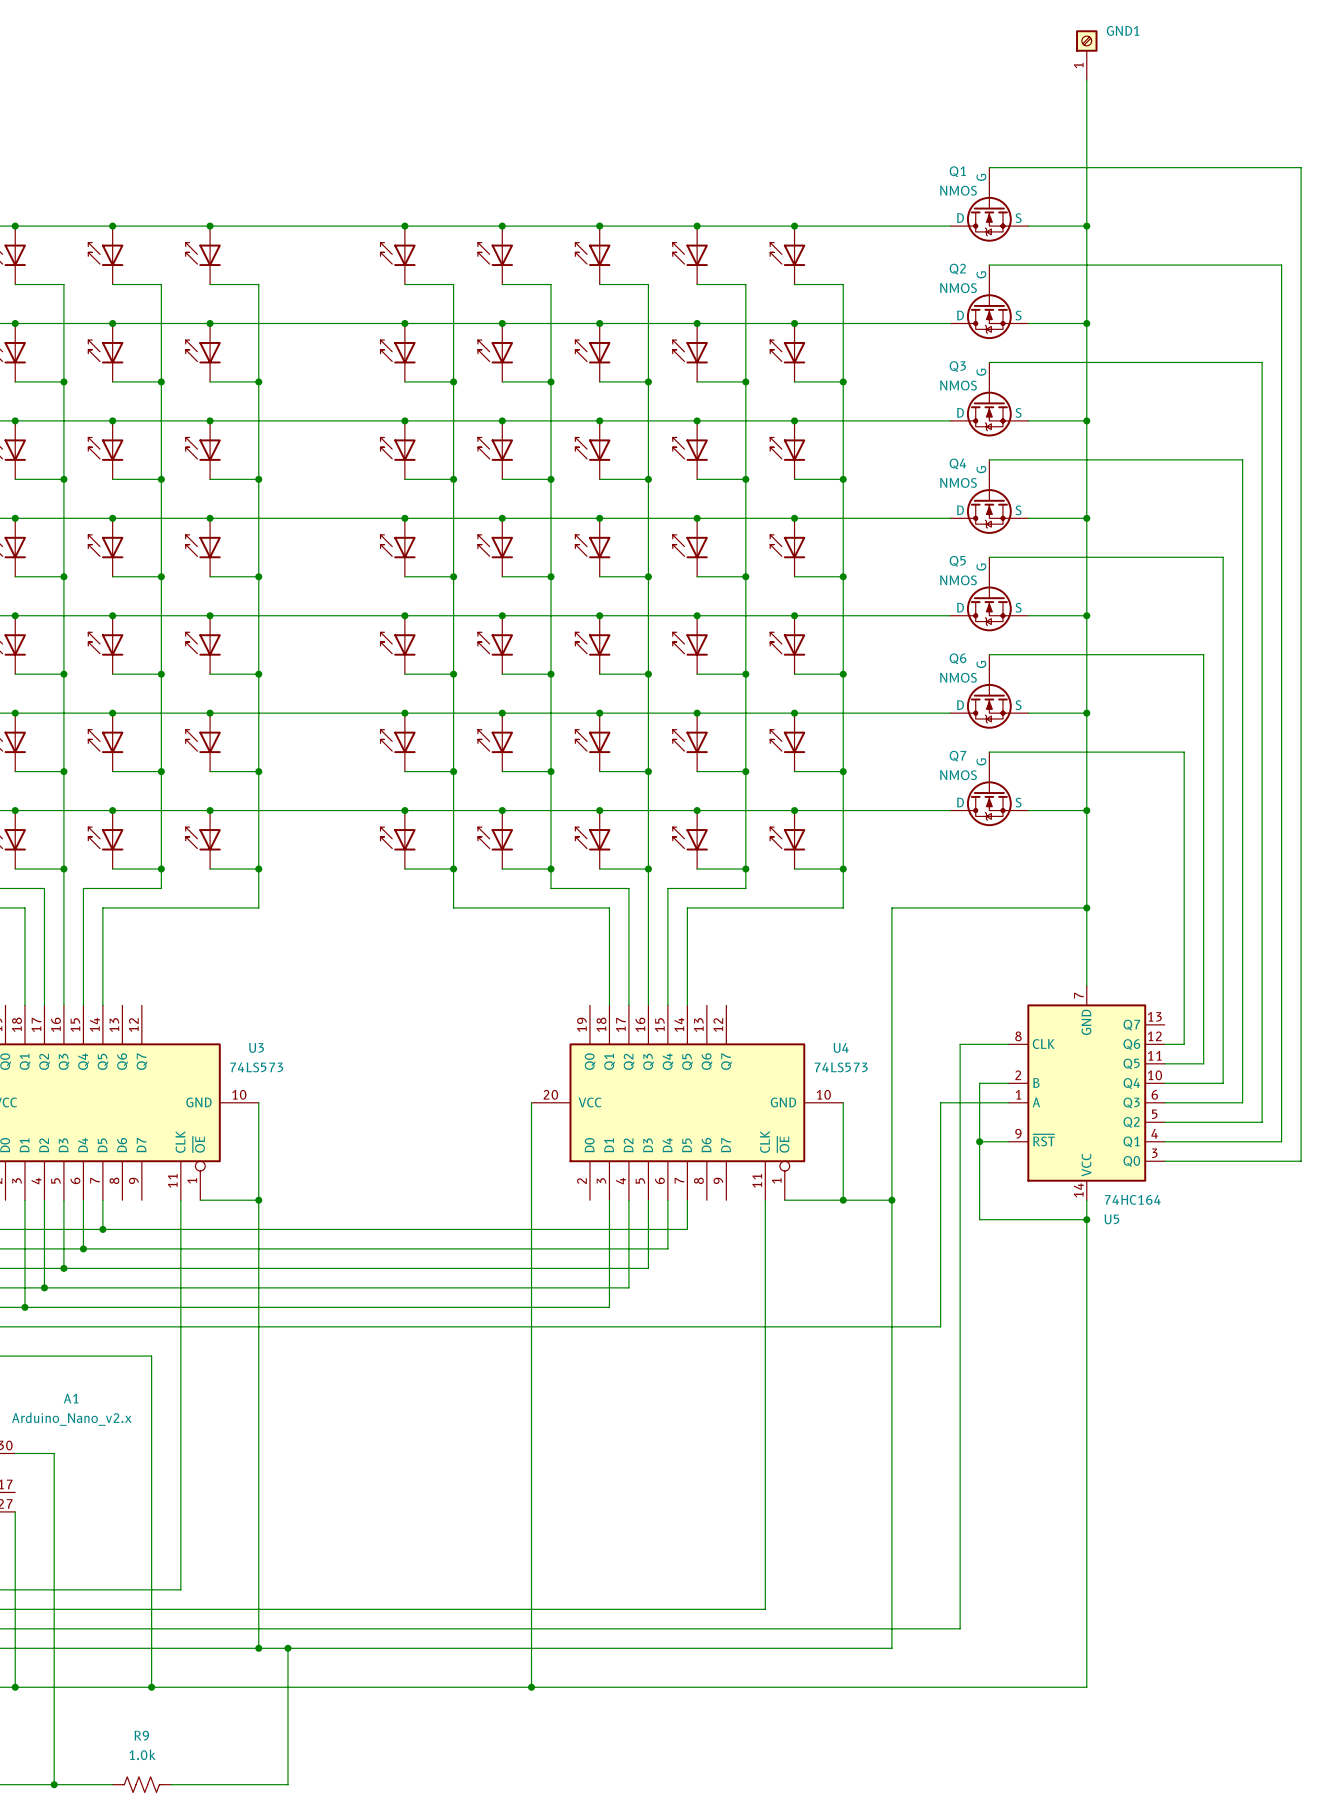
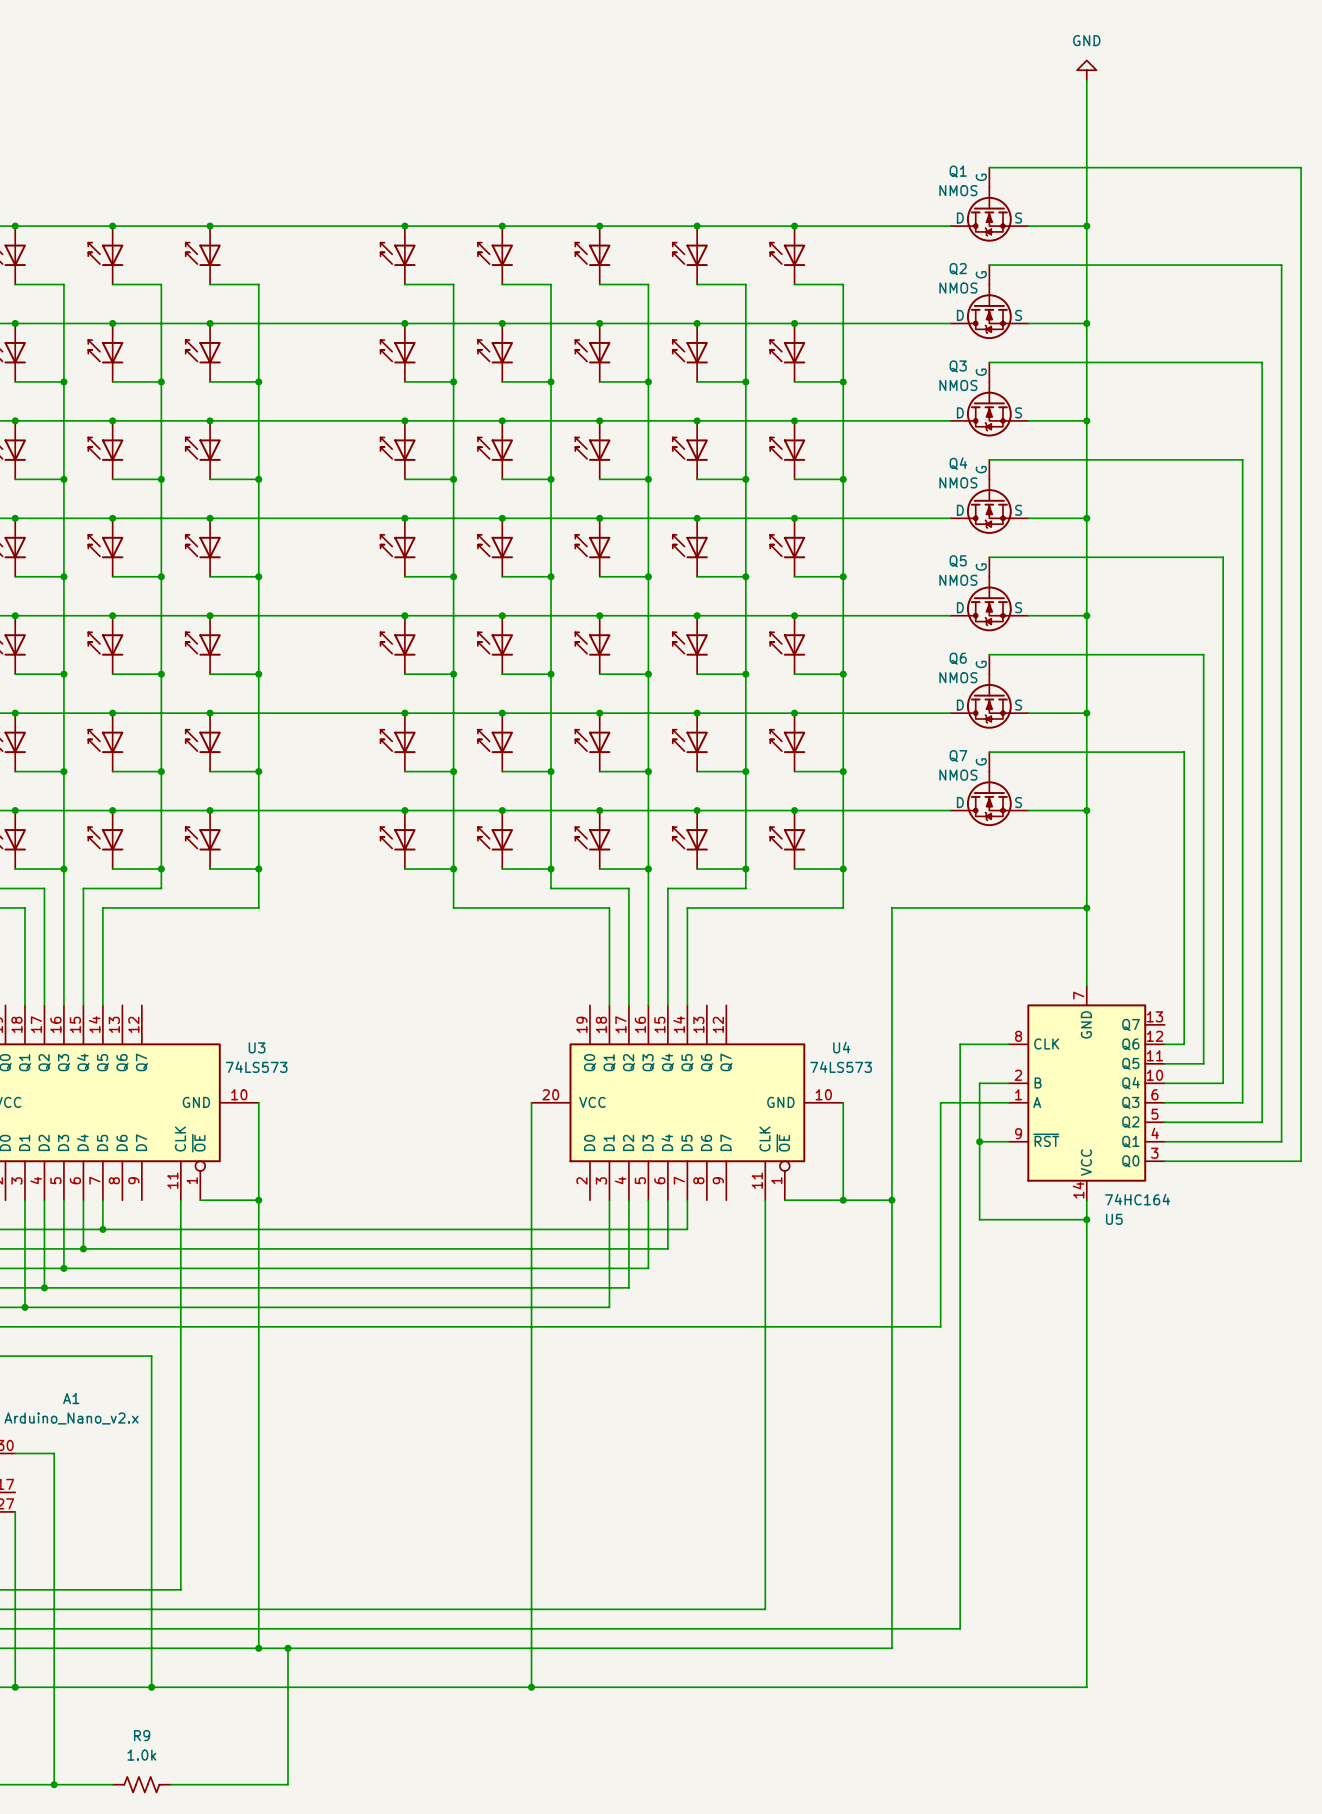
GND1: (1086, 55) -> none
power symbol: none -> GND (1086, 70)

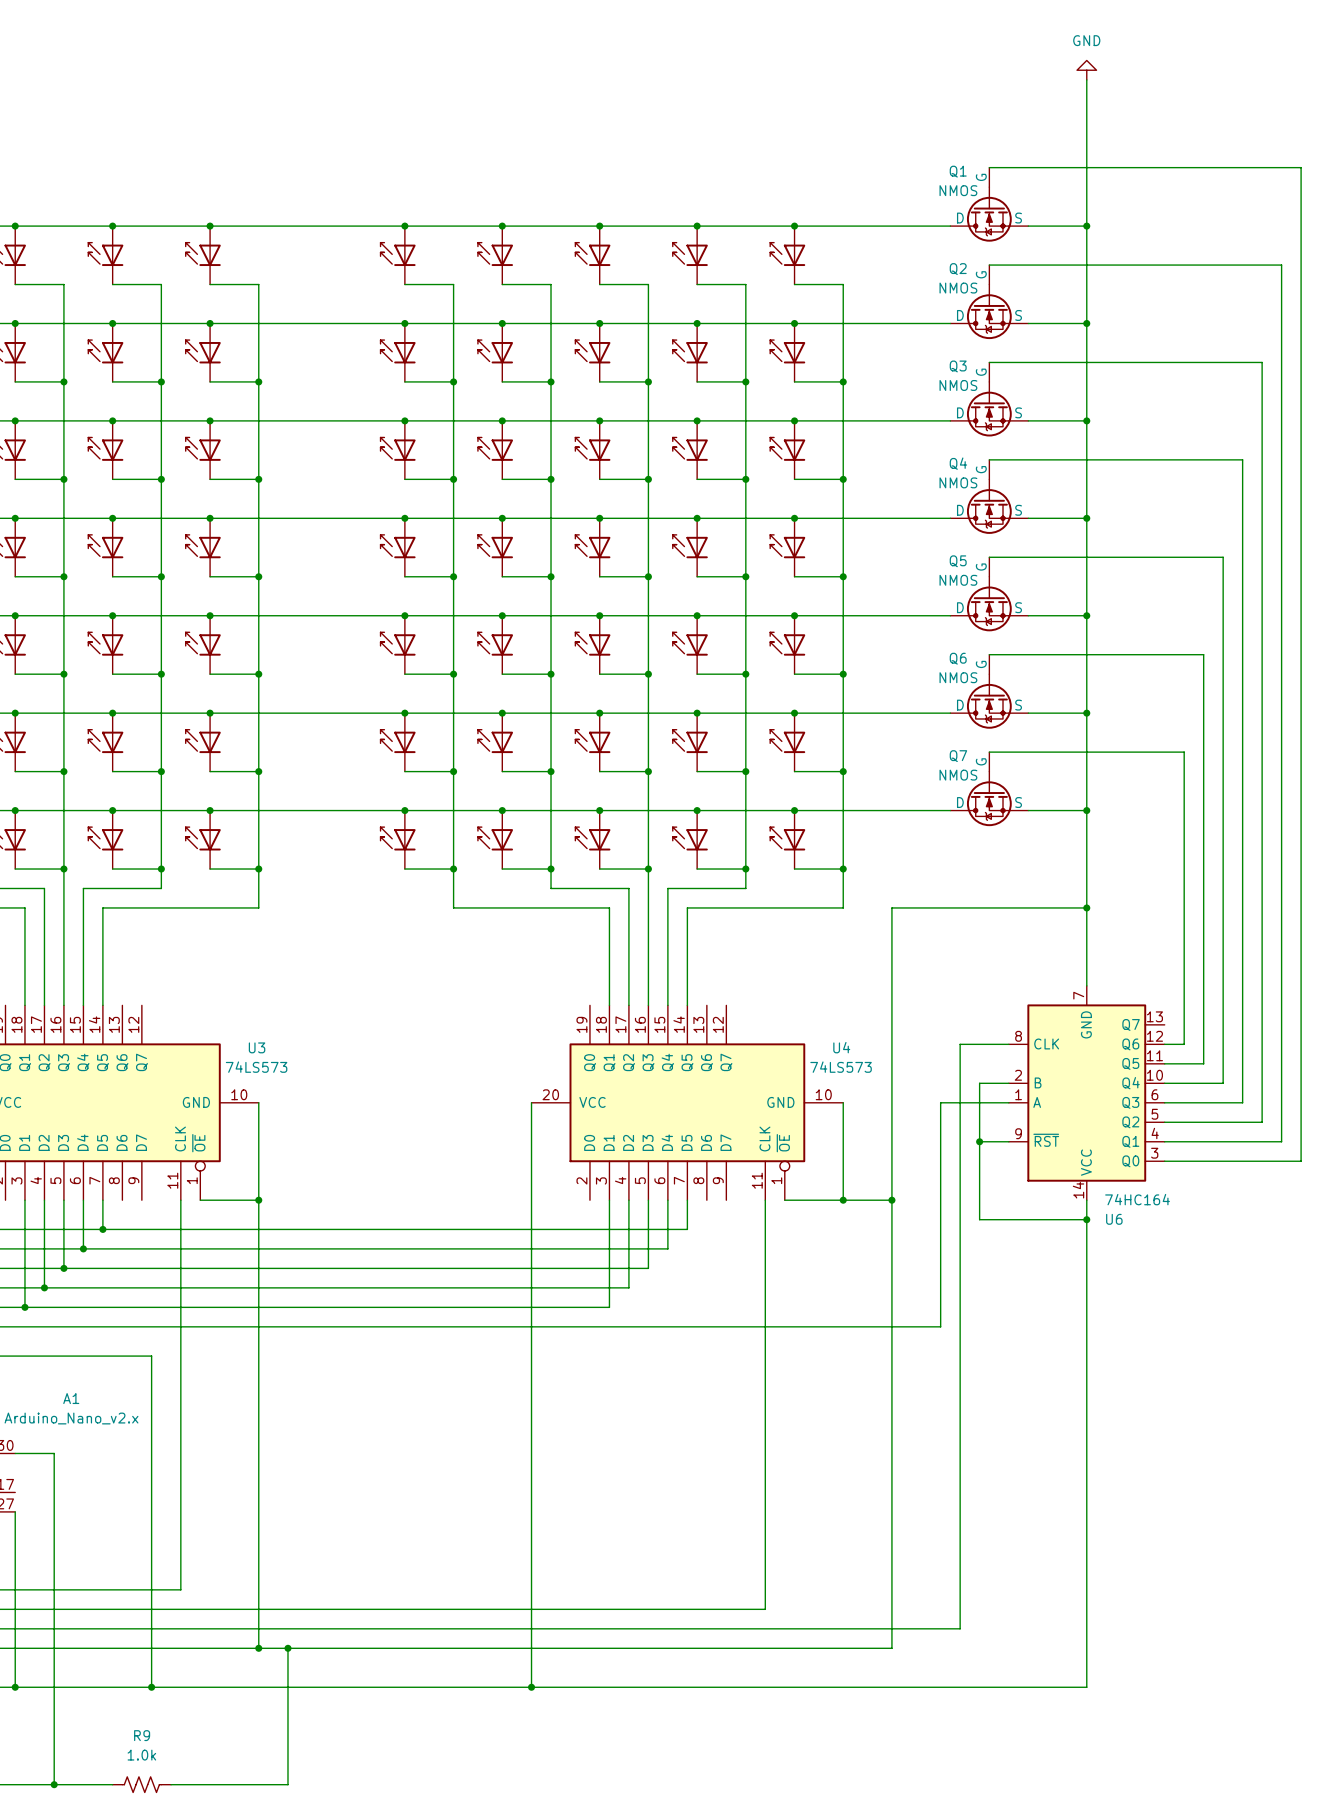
U5 name: U5 (1114, 1219) -> U6 (1114, 1219)

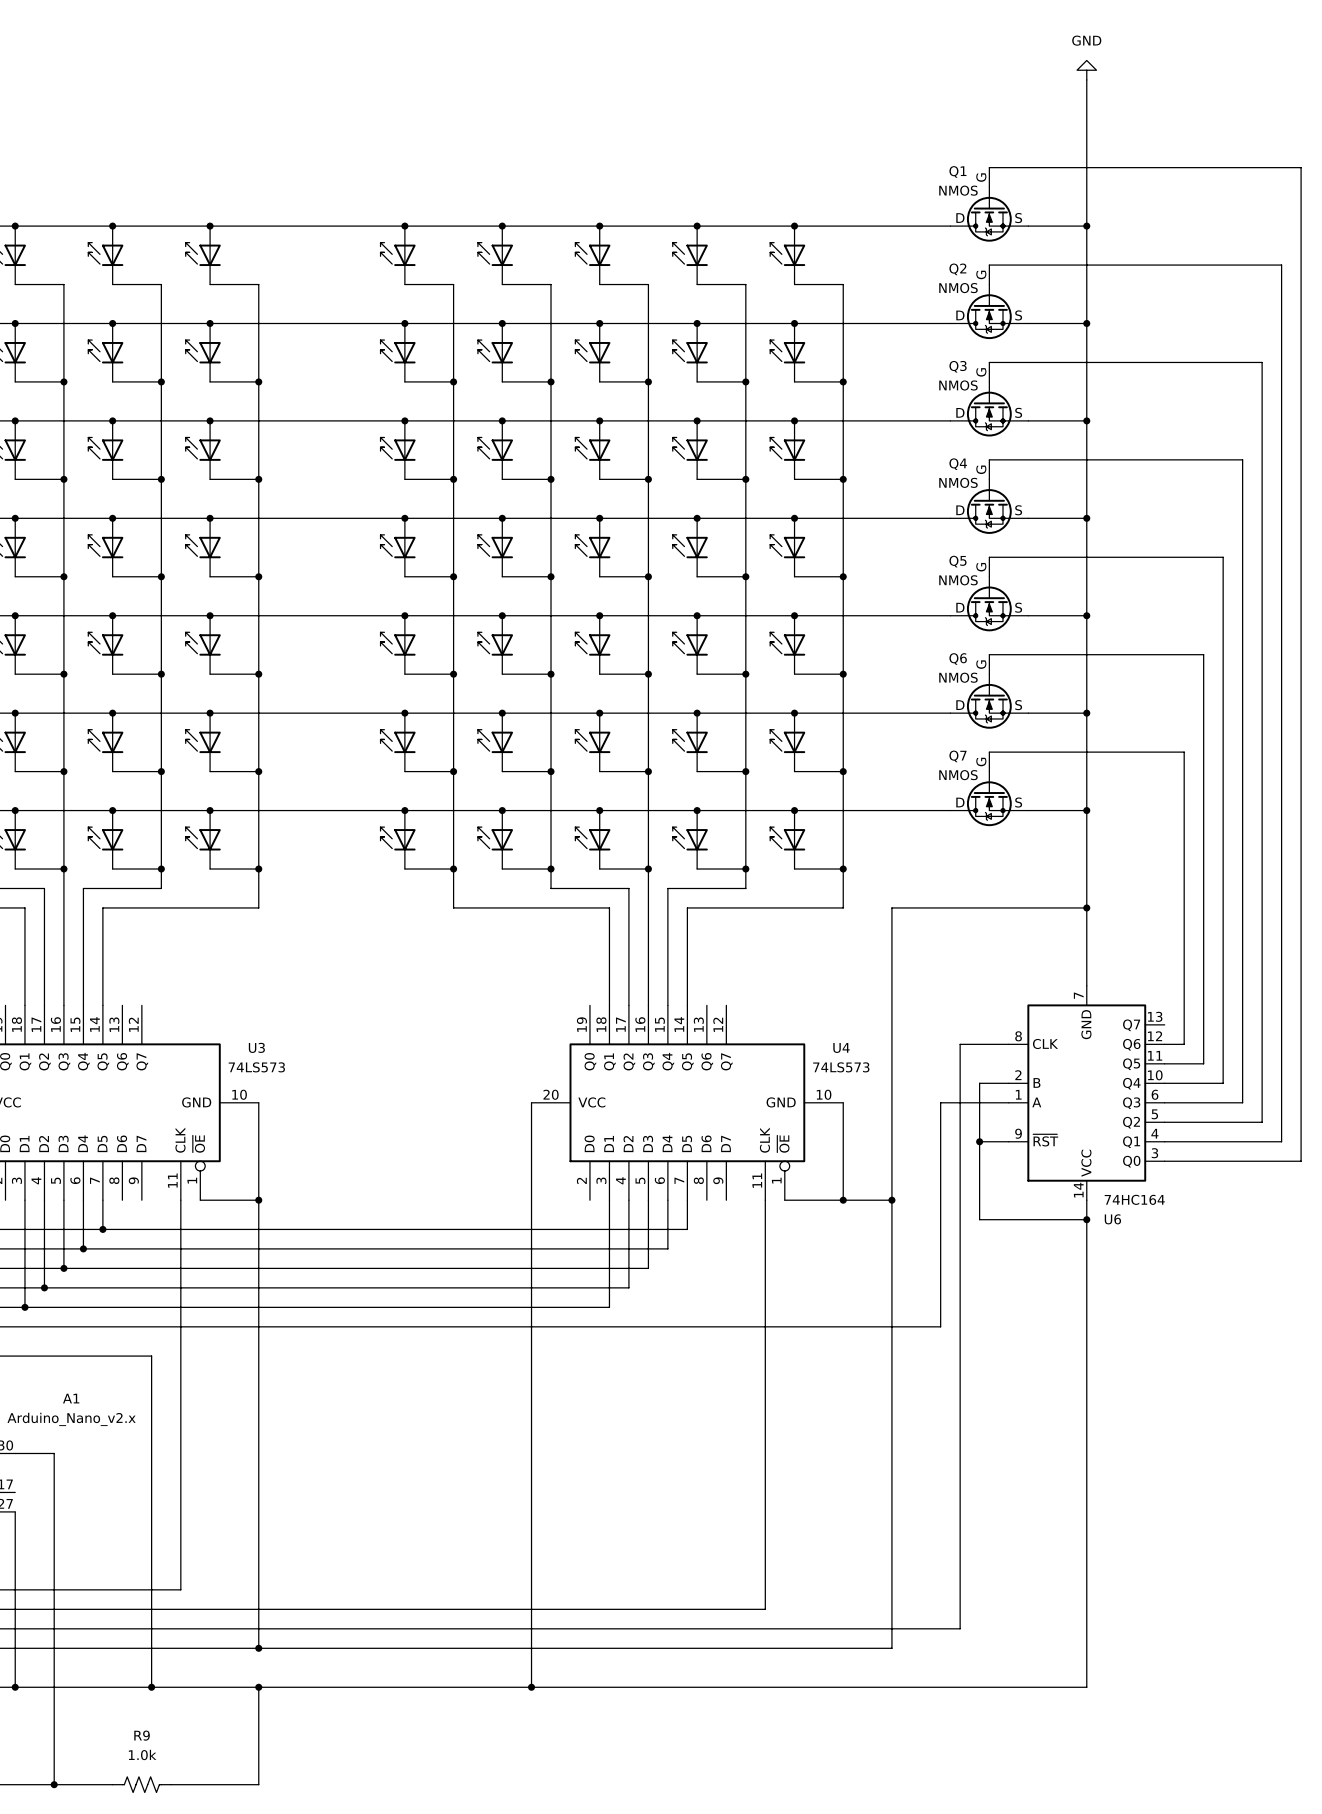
wire: (287, 1648) (287, 1784) (258, 1784) -> (258, 1687) (258, 1784)
junction: (287, 1648) -> none
junction: none -> (258, 1687)

